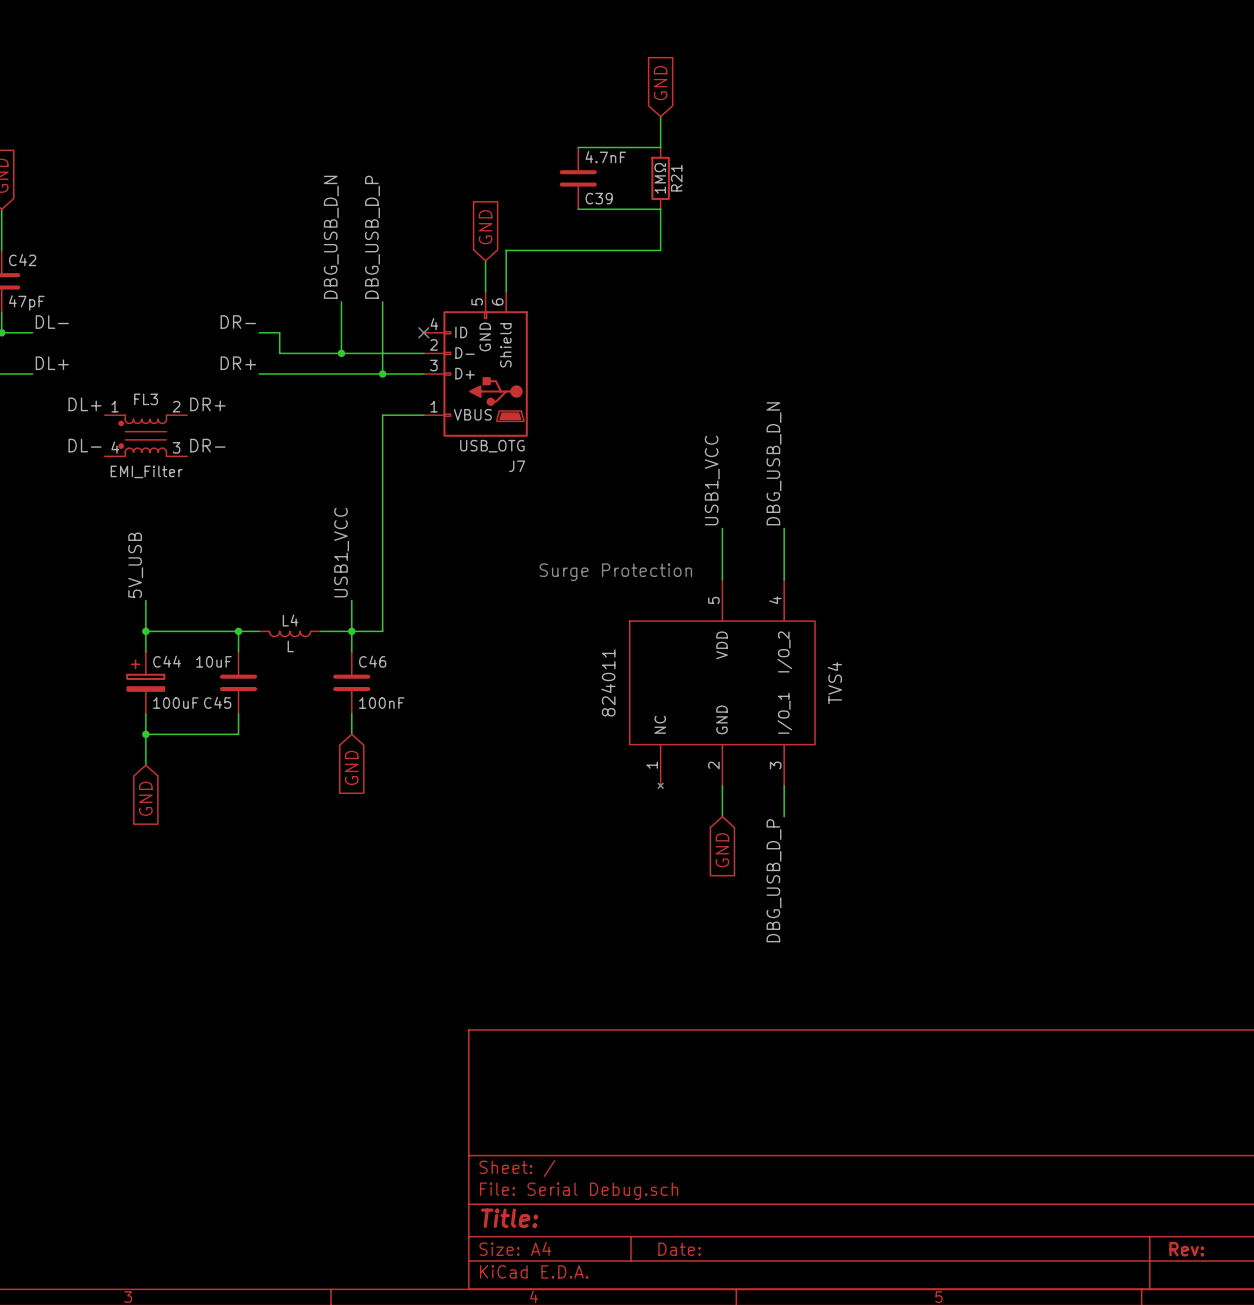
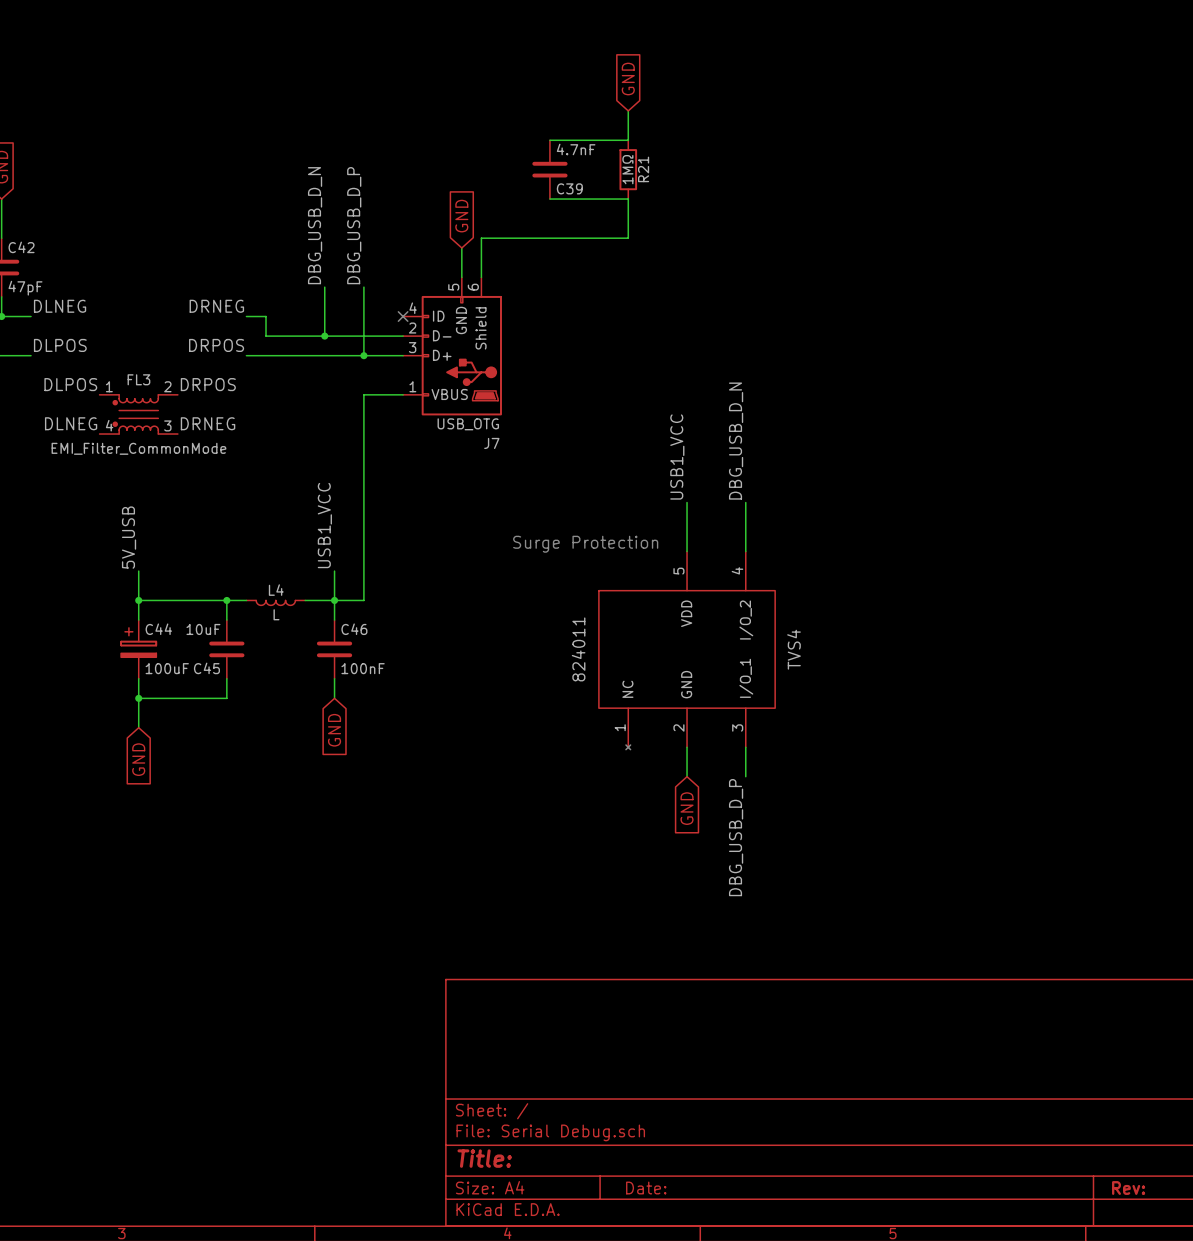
label: DL- (52, 322) -> DLNEG (60, 306)
label: DR- (238, 322) -> DRNEG (216, 306)
label: DL+ (52, 363) -> DLPOS (60, 345)
label: DR+ (238, 363) -> DRPOS (216, 345)
label: DL+ (85, 404) -> DLPOS (70, 384)
label: DR+ (207, 404) -> DRPOS (208, 384)
label: DL- (85, 445) -> DLNEG (71, 423)
label: DR- (207, 445) -> DRNEG (208, 423)
FL3 value: EMI_Filter (146, 471) -> EMI_Filter_CommonMode (138, 448)

